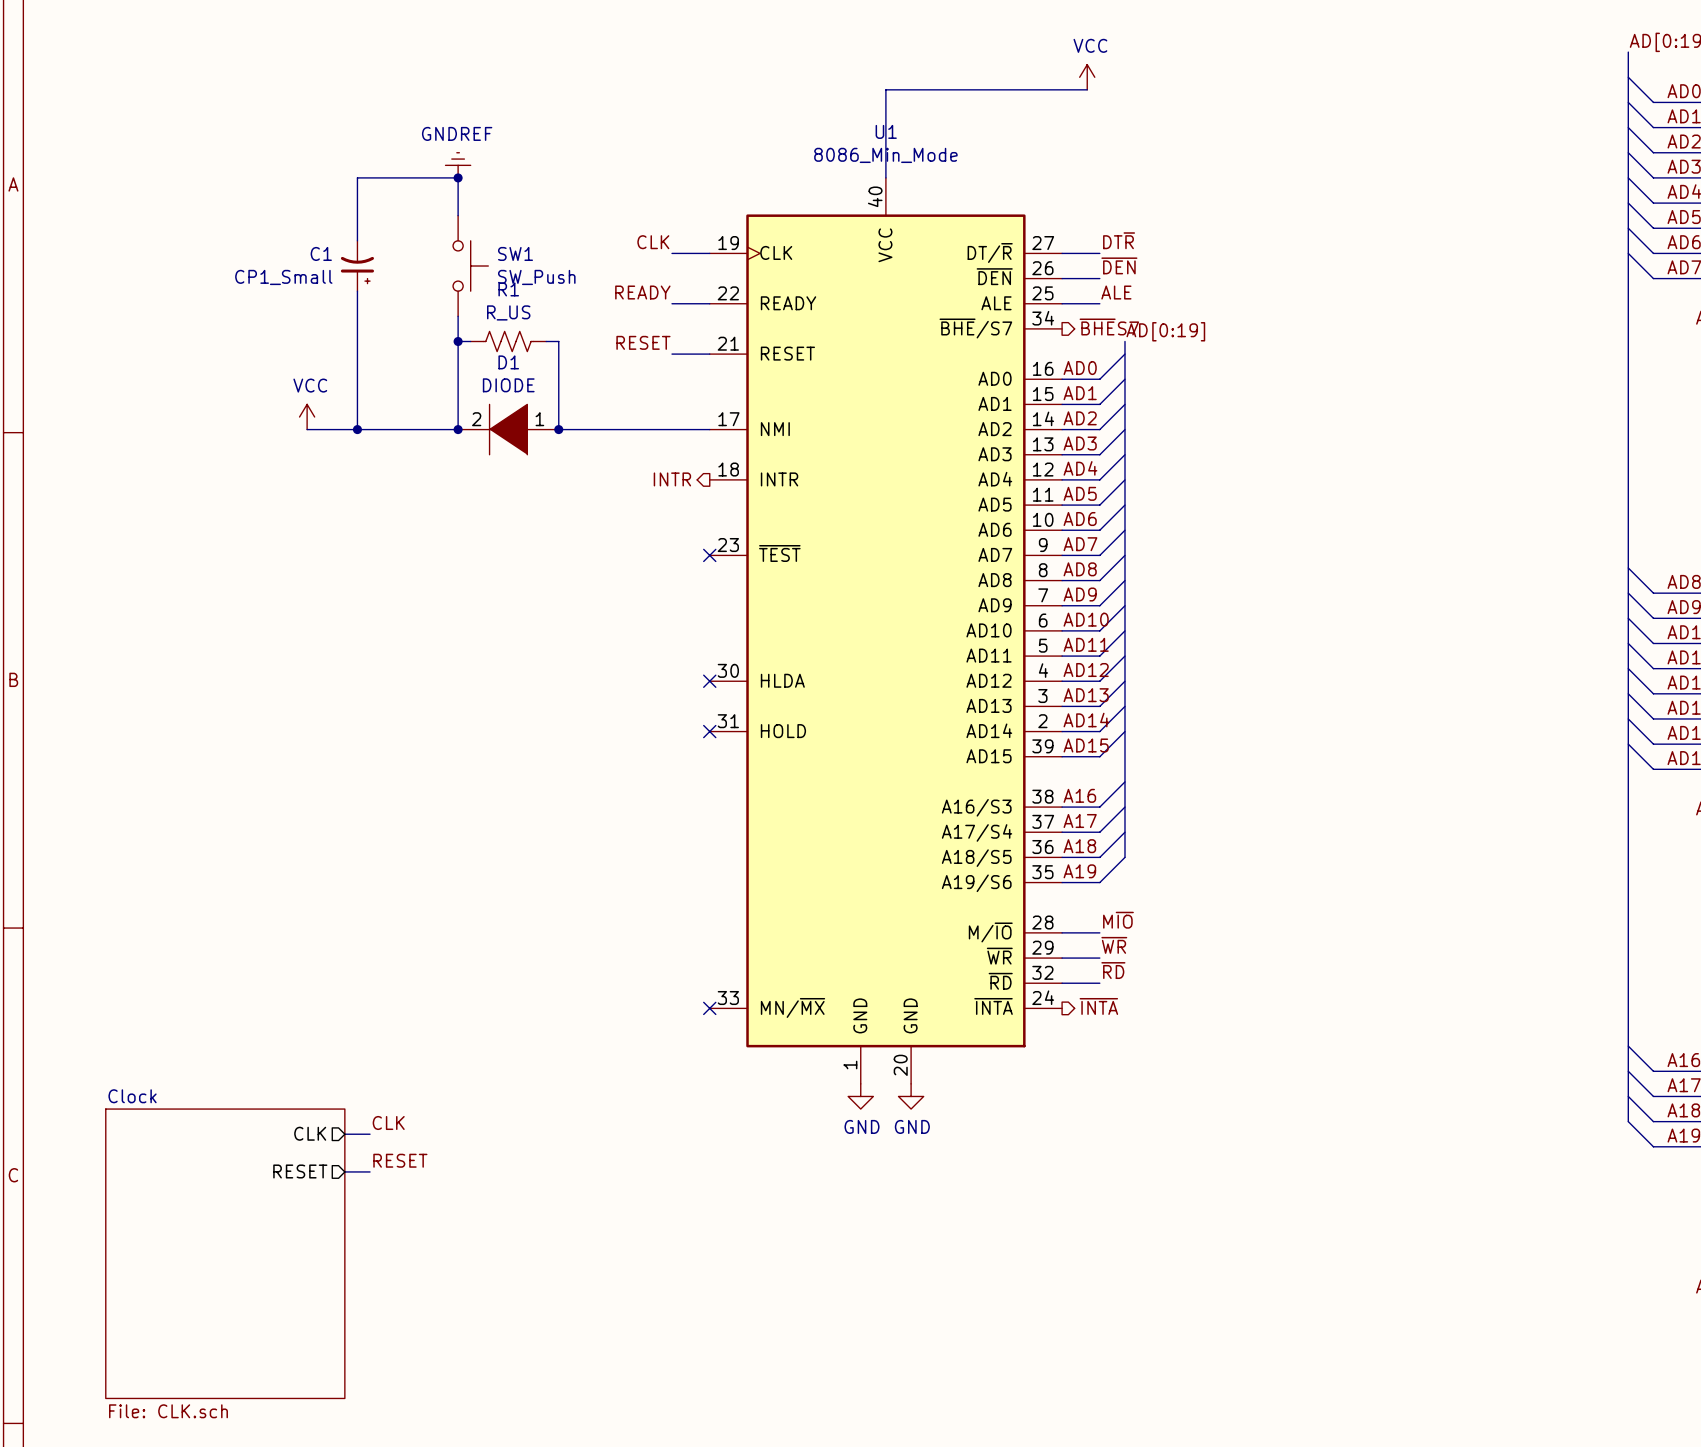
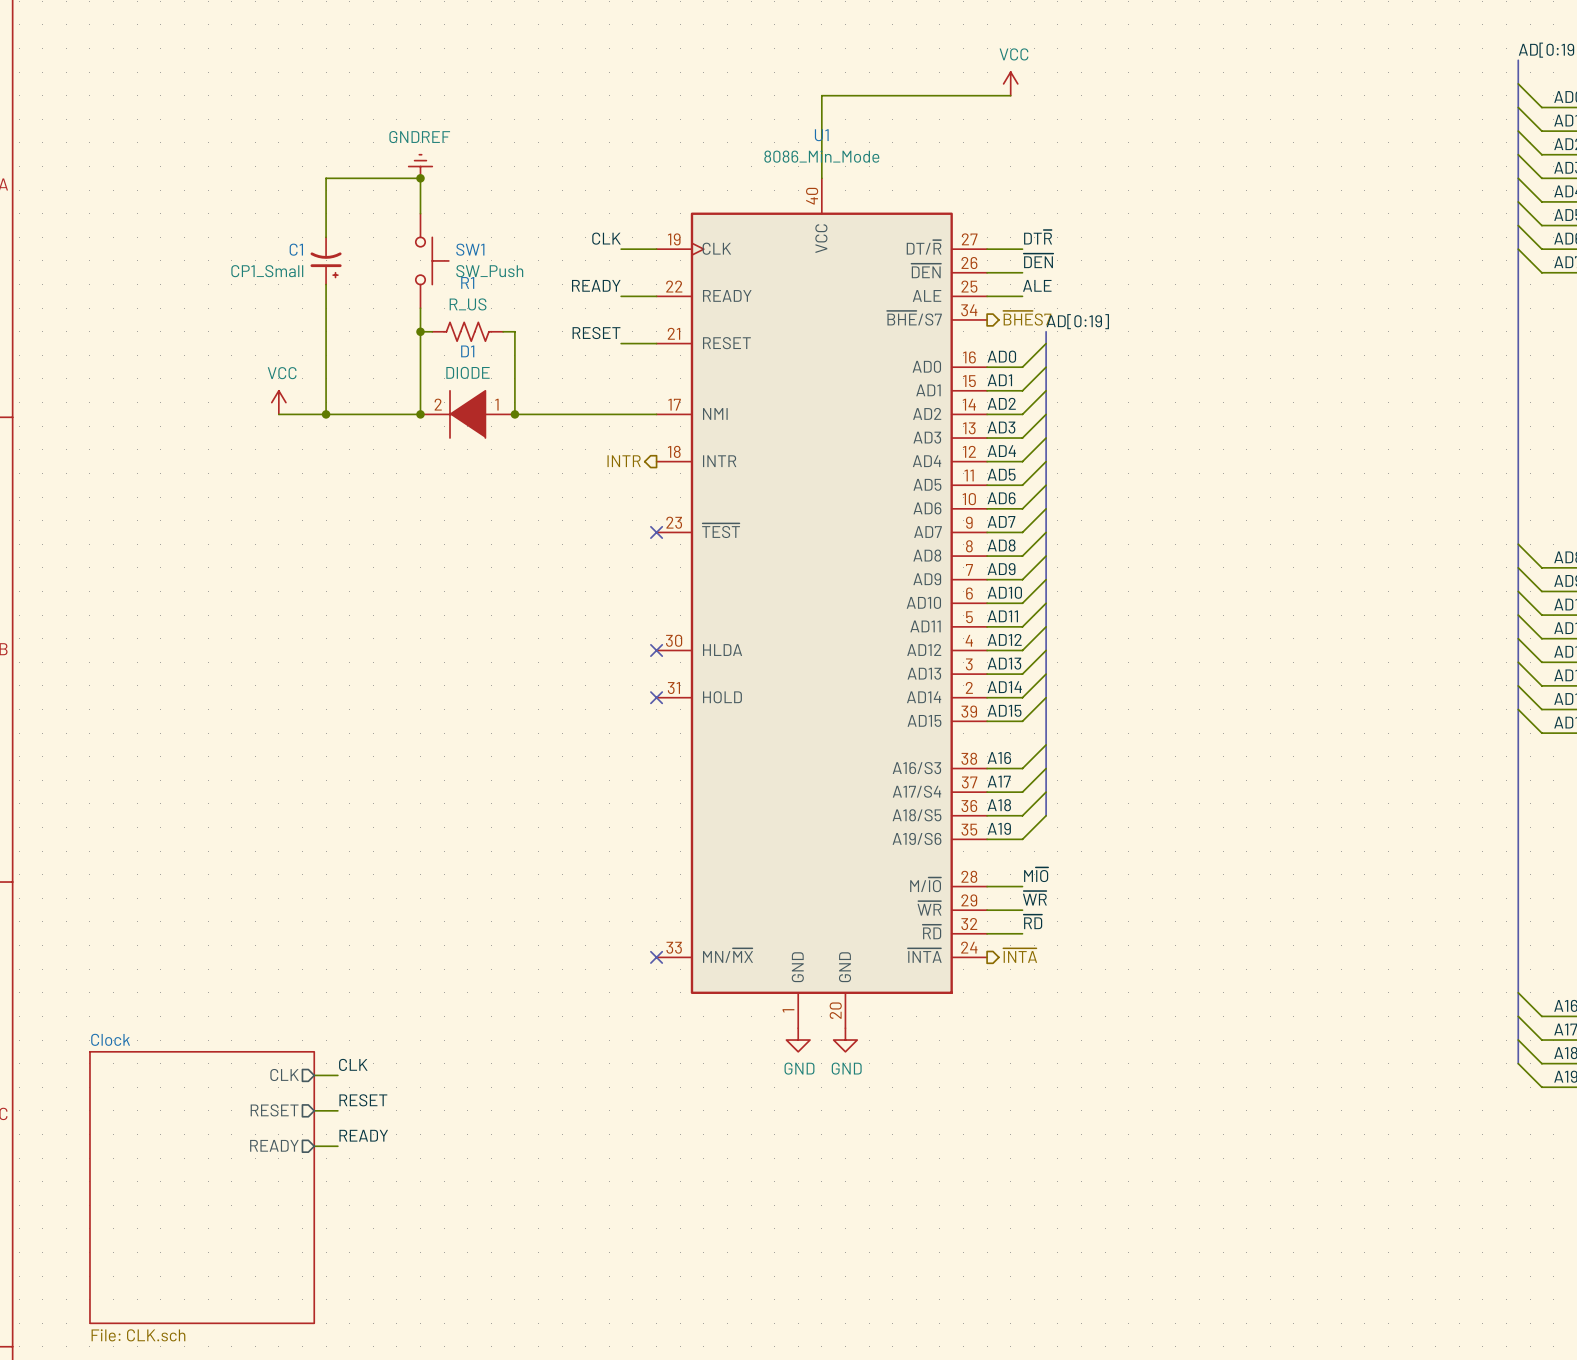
label: none -> READY (363, 1135)
sheet pin: none -> READY (274, 1145)
wire: none -> (314, 1146) (337, 1146)

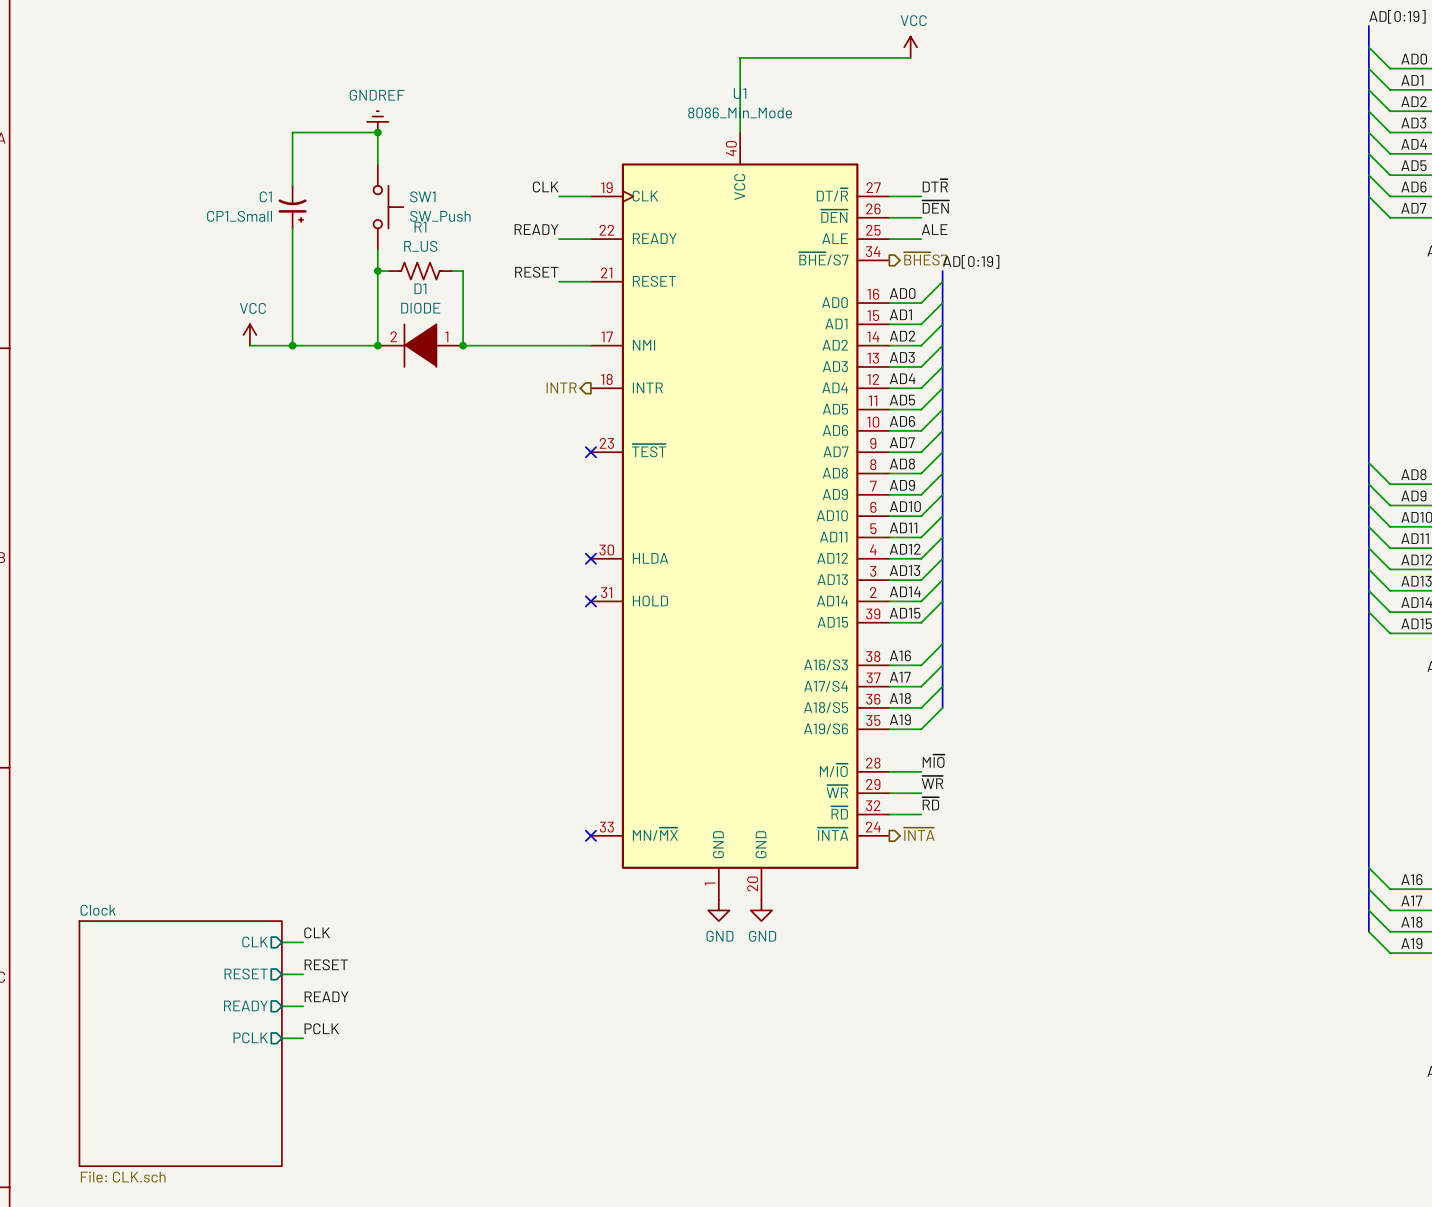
label: none -> PCLK (321, 1028)
sheet pin: none -> PCLK (250, 1037)
wire: none -> (281, 1038) (303, 1038)

